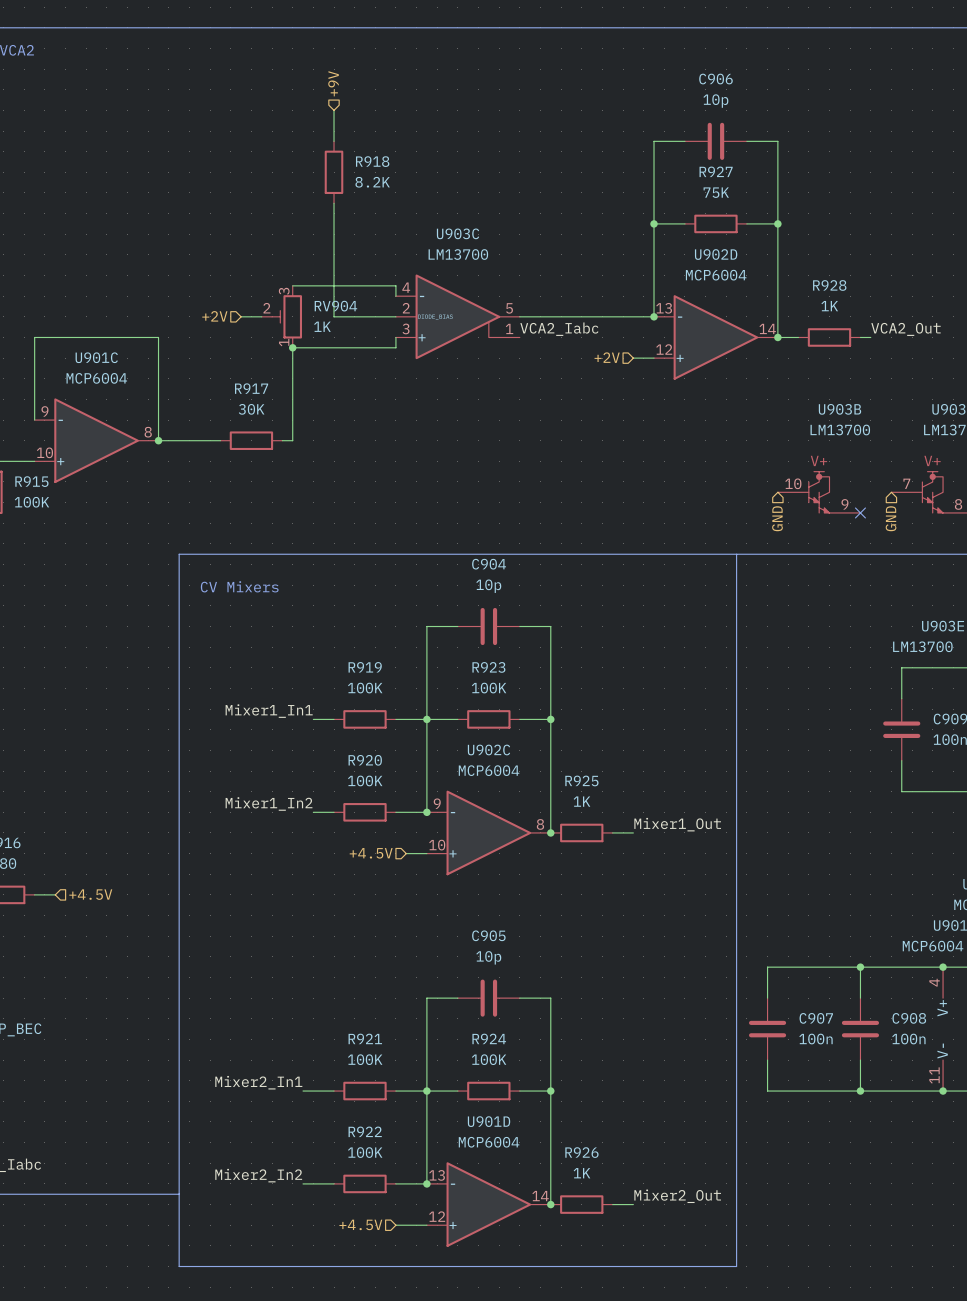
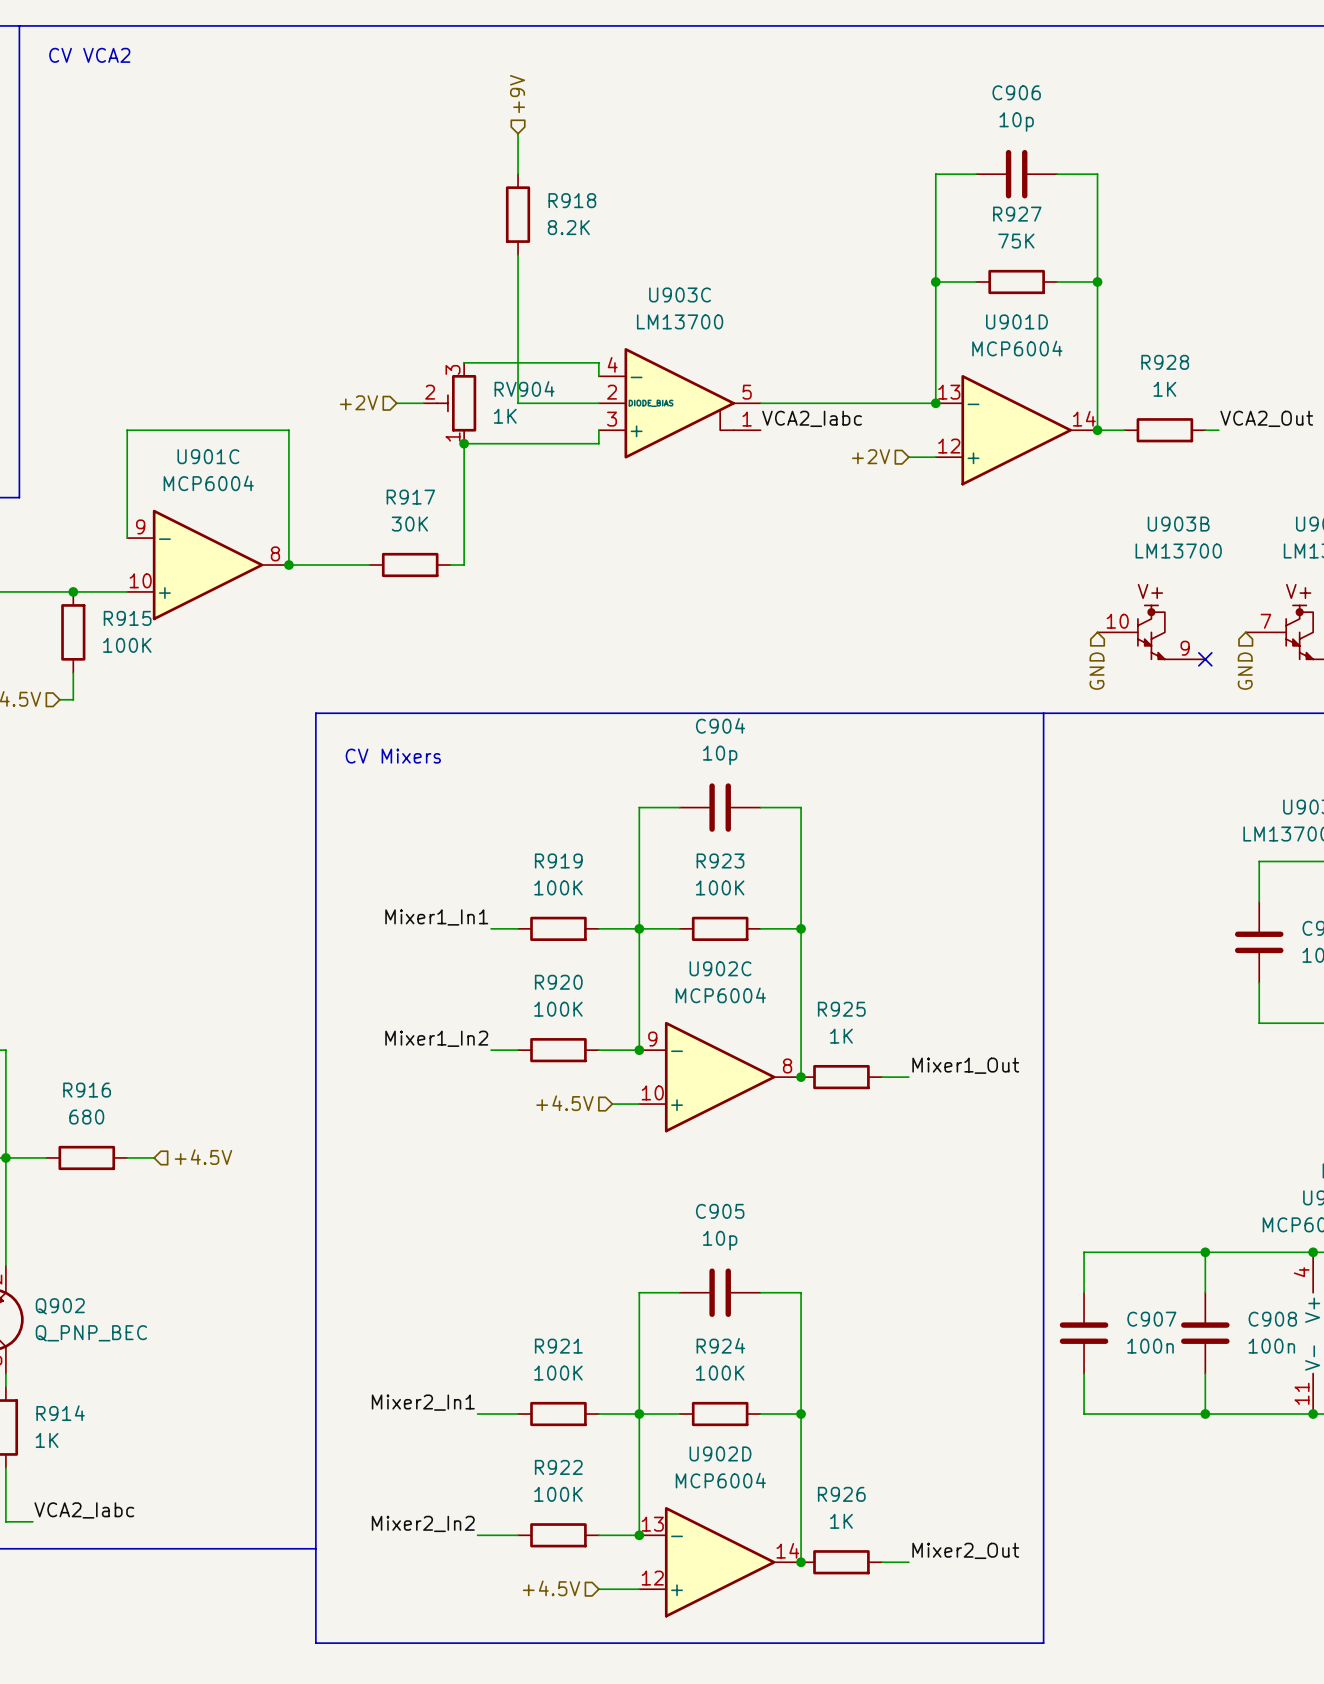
U902D name: U902D (716, 254) -> U901D (1016, 321)
U901D name: U901D (489, 1121) -> U902D (720, 1453)

